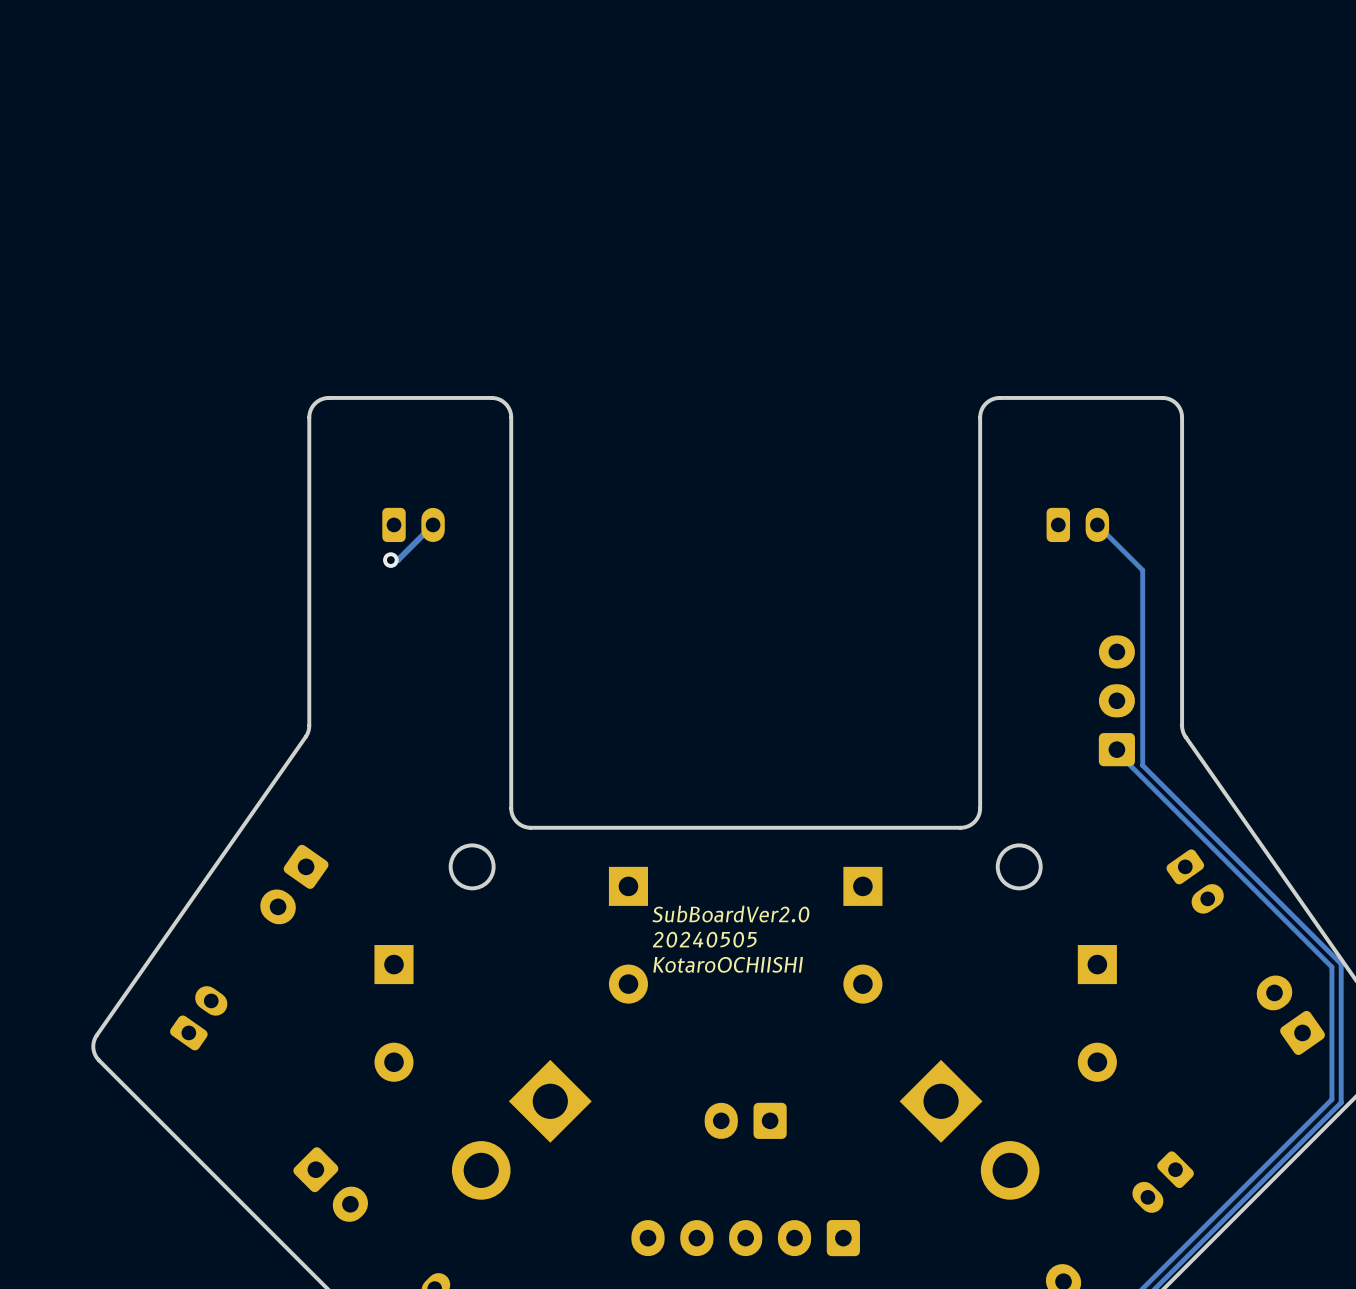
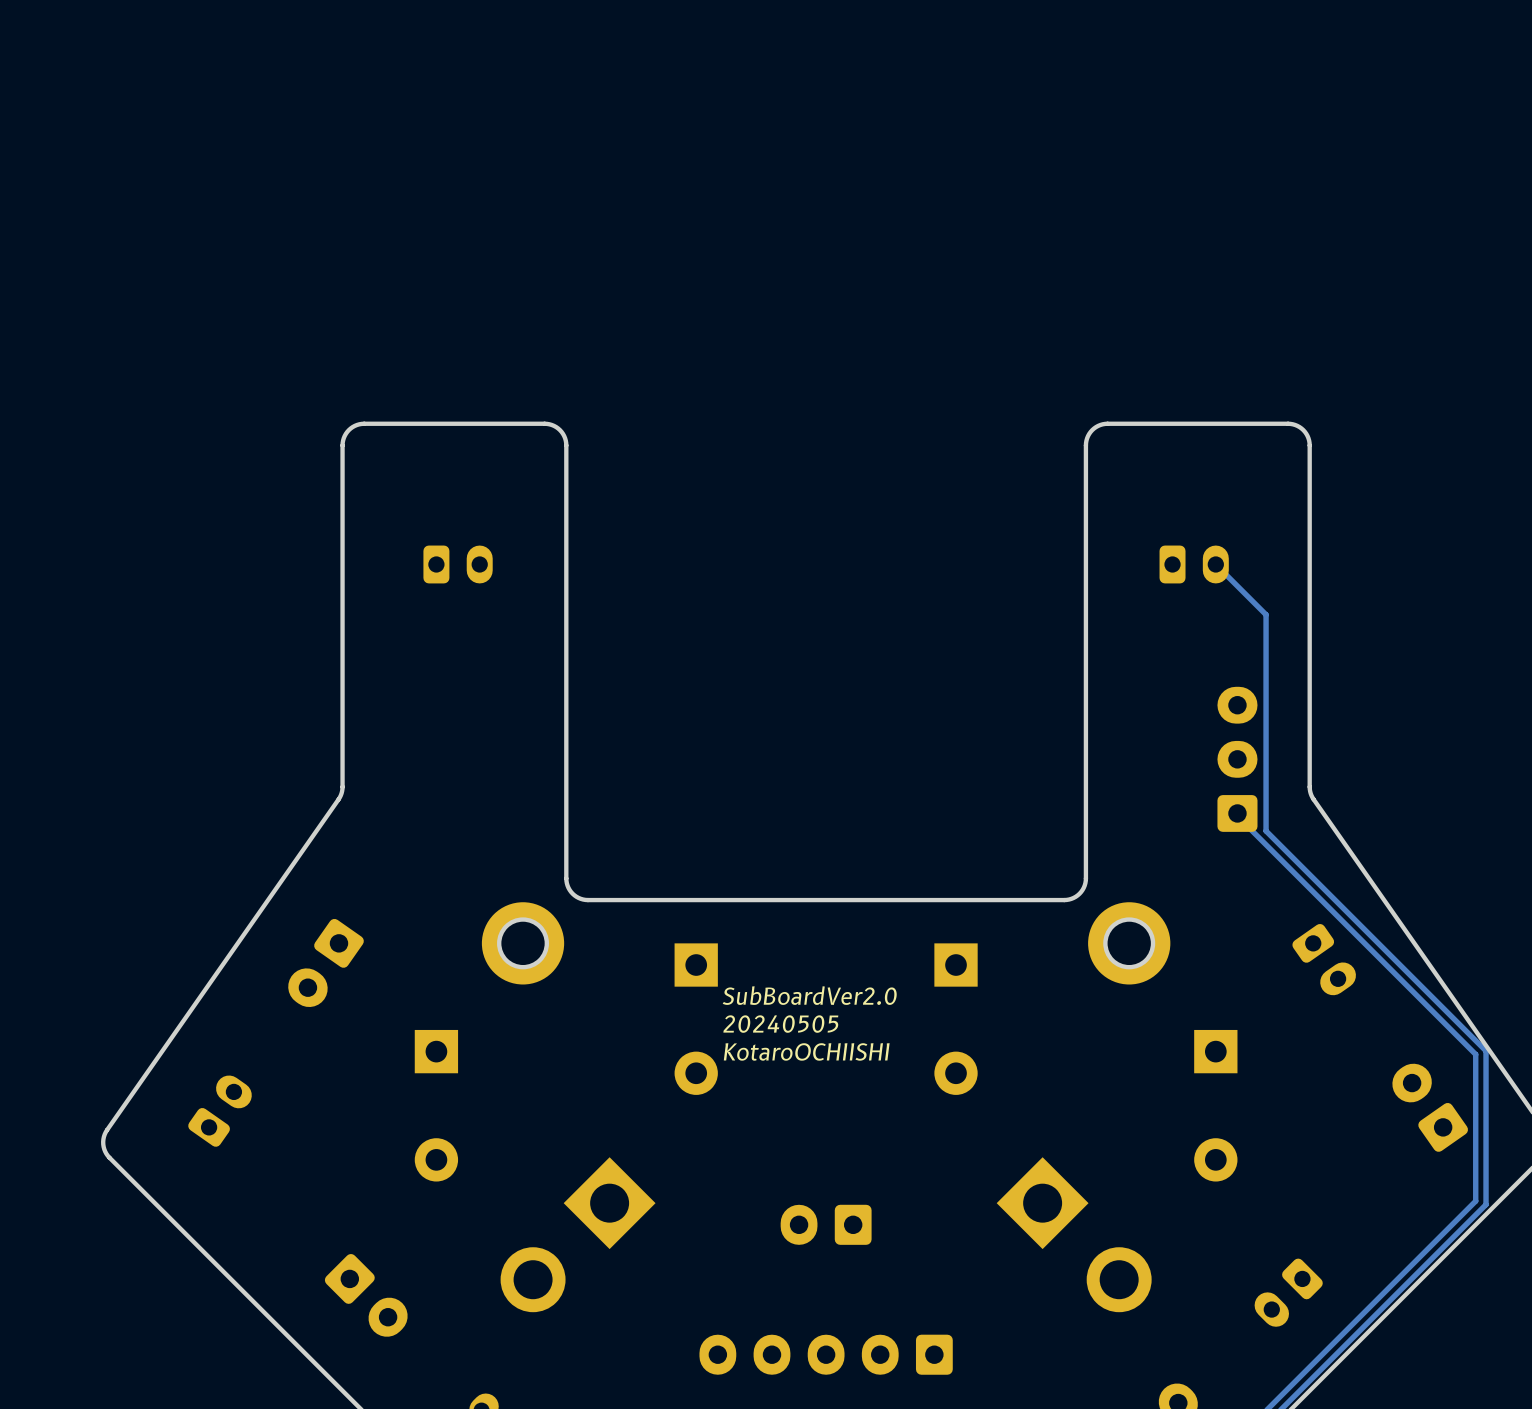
track: (433, 524) (397, 560) (390, 560) -> none
via: (390, 560) -> none
part: none -> (523, 943)
part: none -> (1129, 943)

